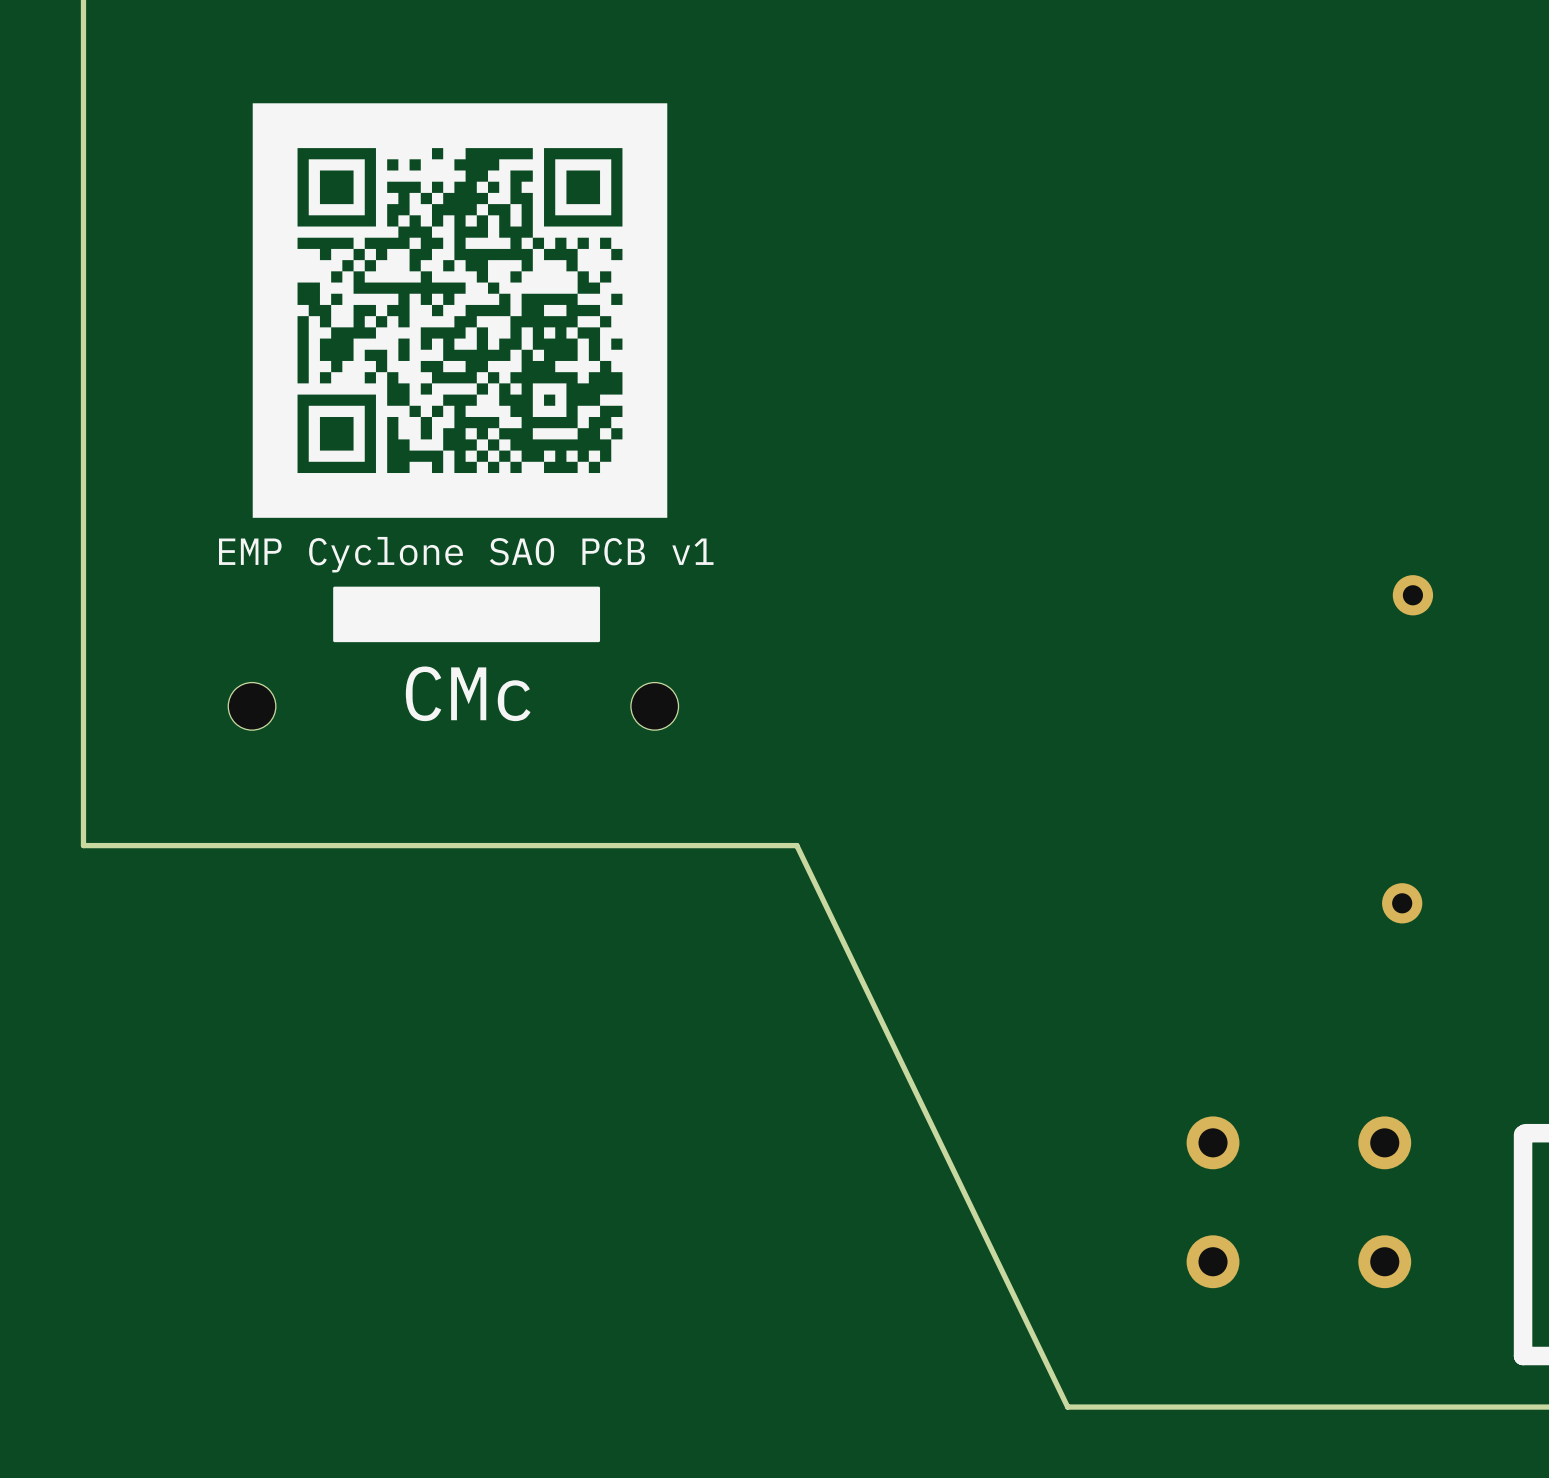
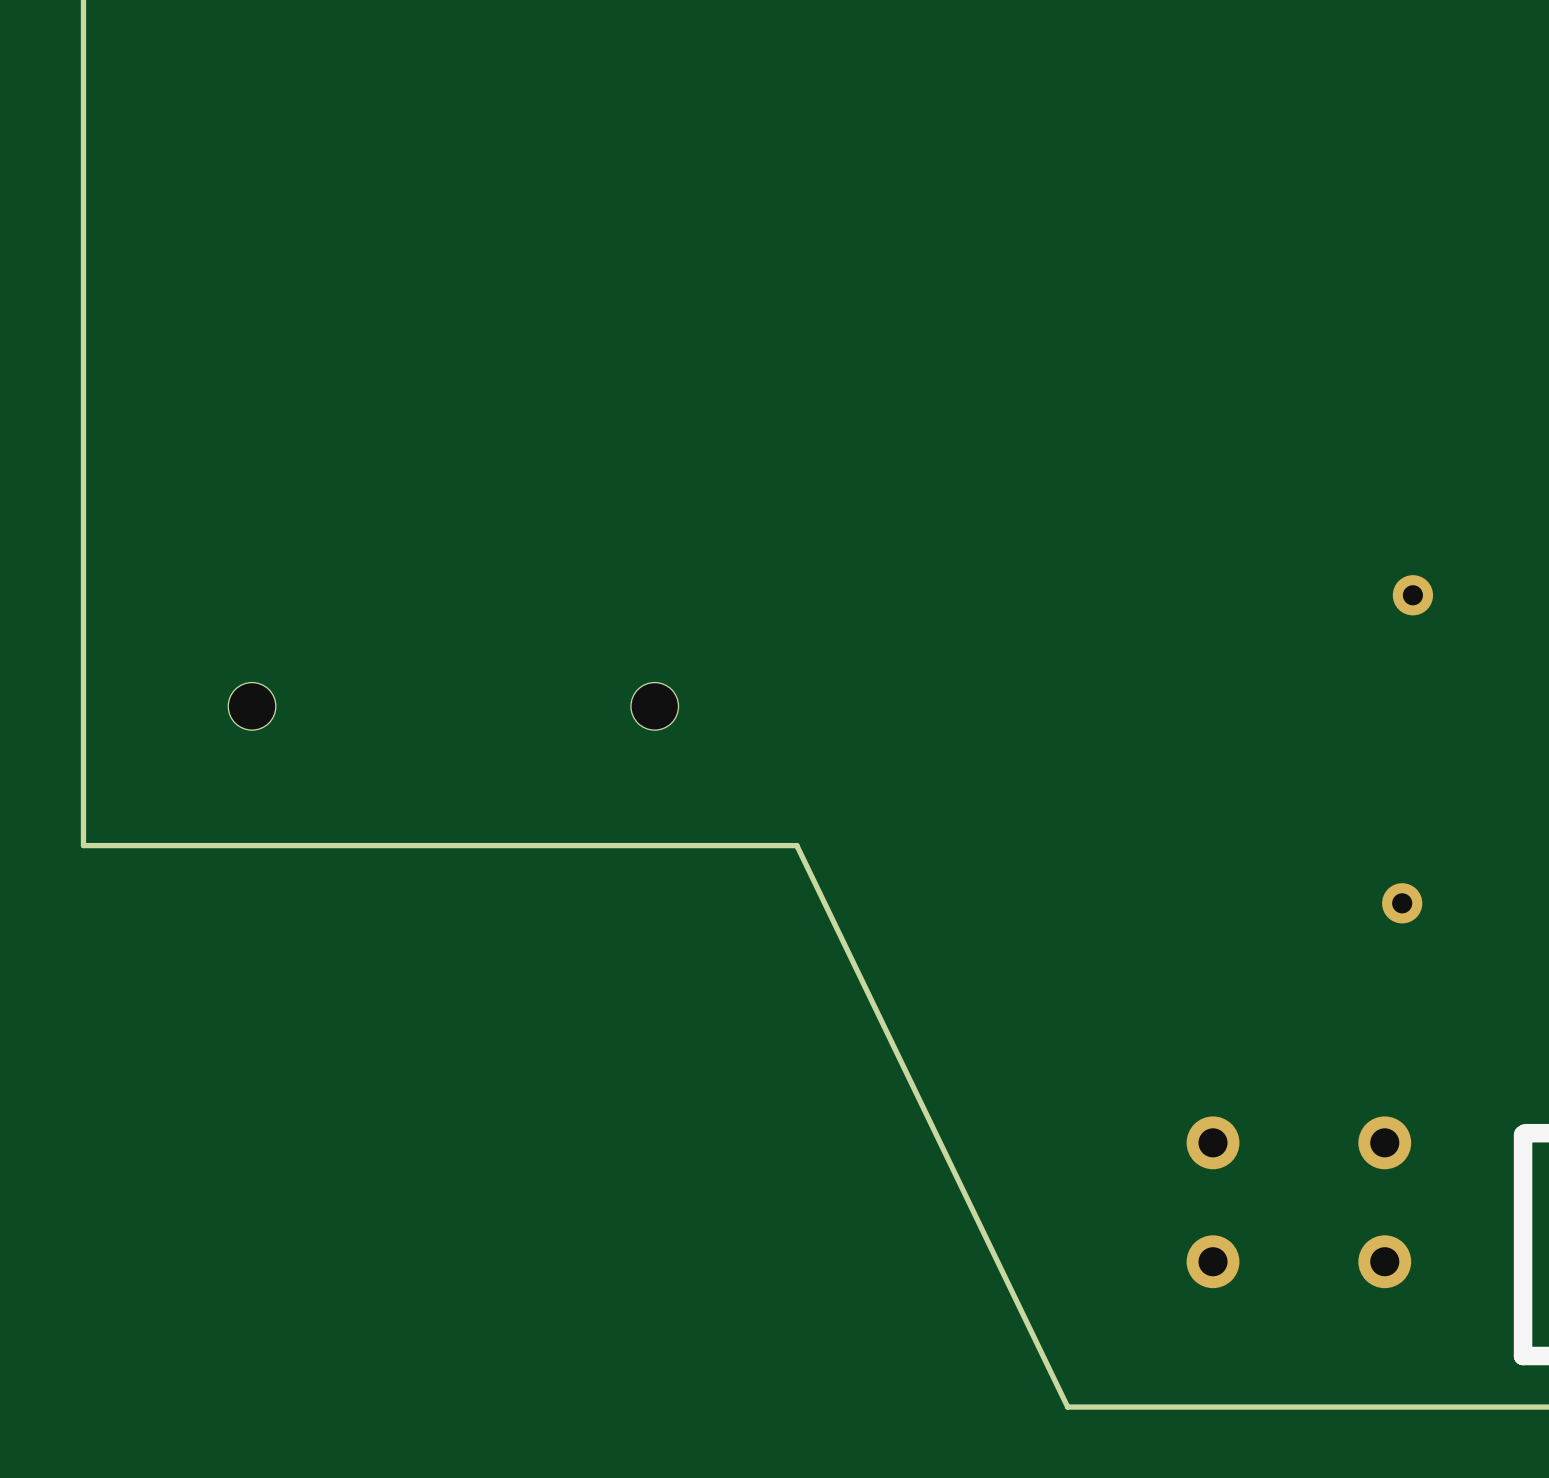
drawing: [252, 103, 668, 518] -> none
text: EMP Cyclone SAO PCB v1 (466, 554) -> none
drawing: [333, 586, 601, 643] -> none
text: CMc (468, 693) -> none

